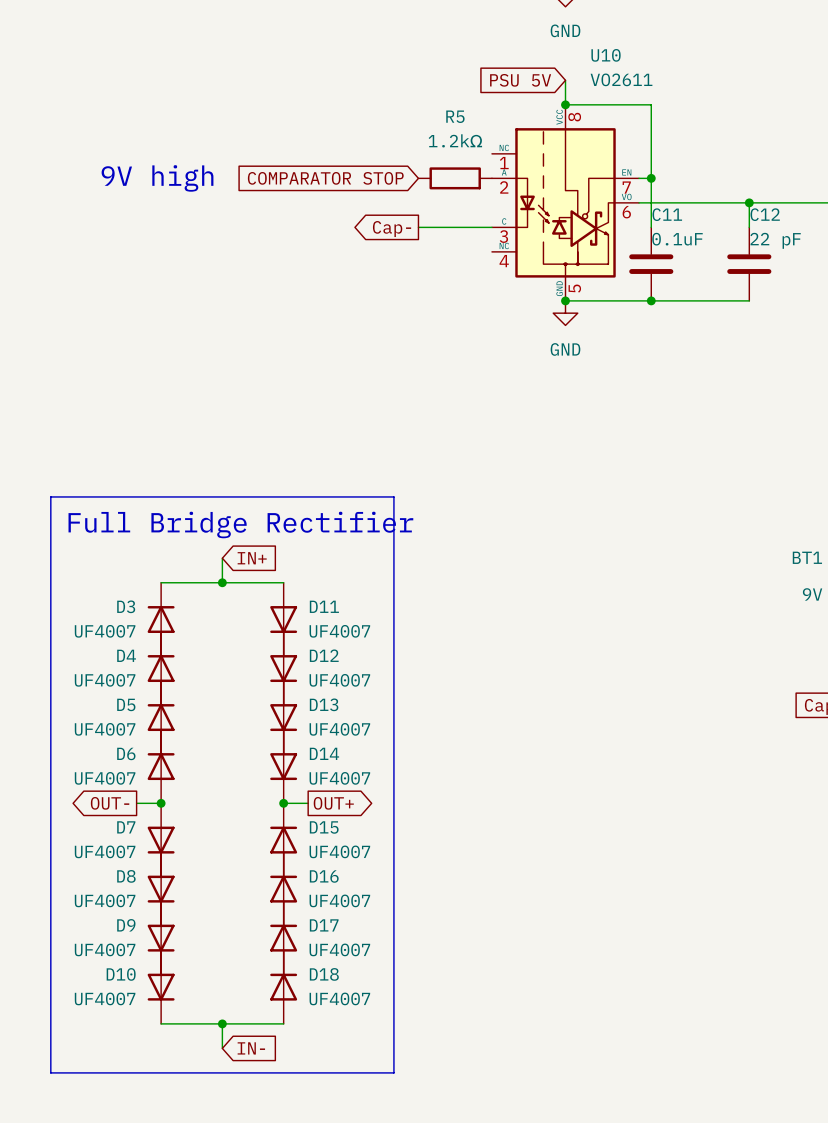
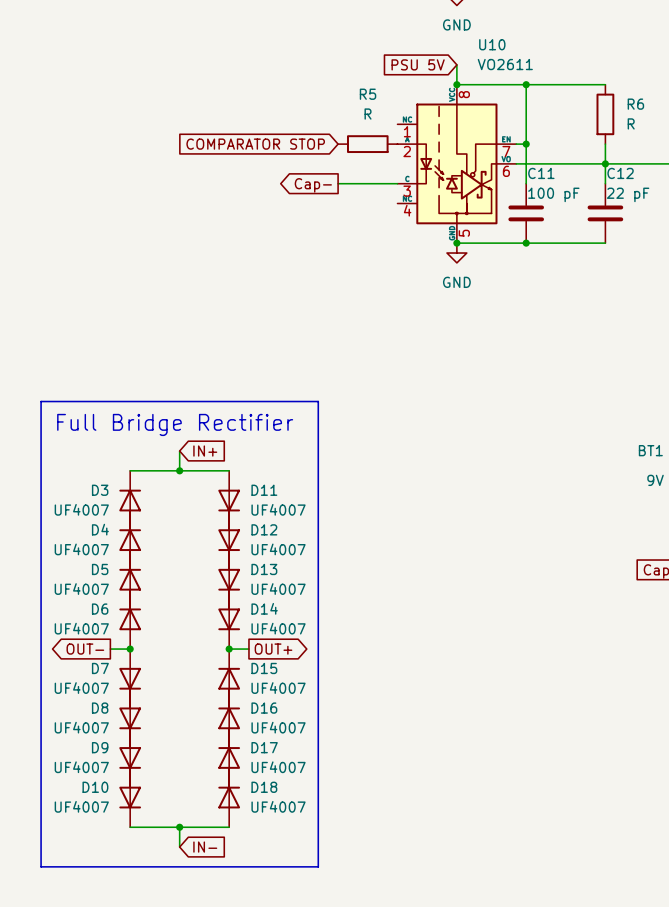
wire: none -> (526, 84) (605, 84)
junction: none -> (526, 84)
R5 value: 1.2kΩ (455, 140) -> R (368, 114)
R6: none -> R (605, 114)
text: 9V high (157, 178) -> none
wire: none -> (605, 144) (605, 163)
C11 value: 0.1uF (677, 239) -> 100 pF (553, 194)

